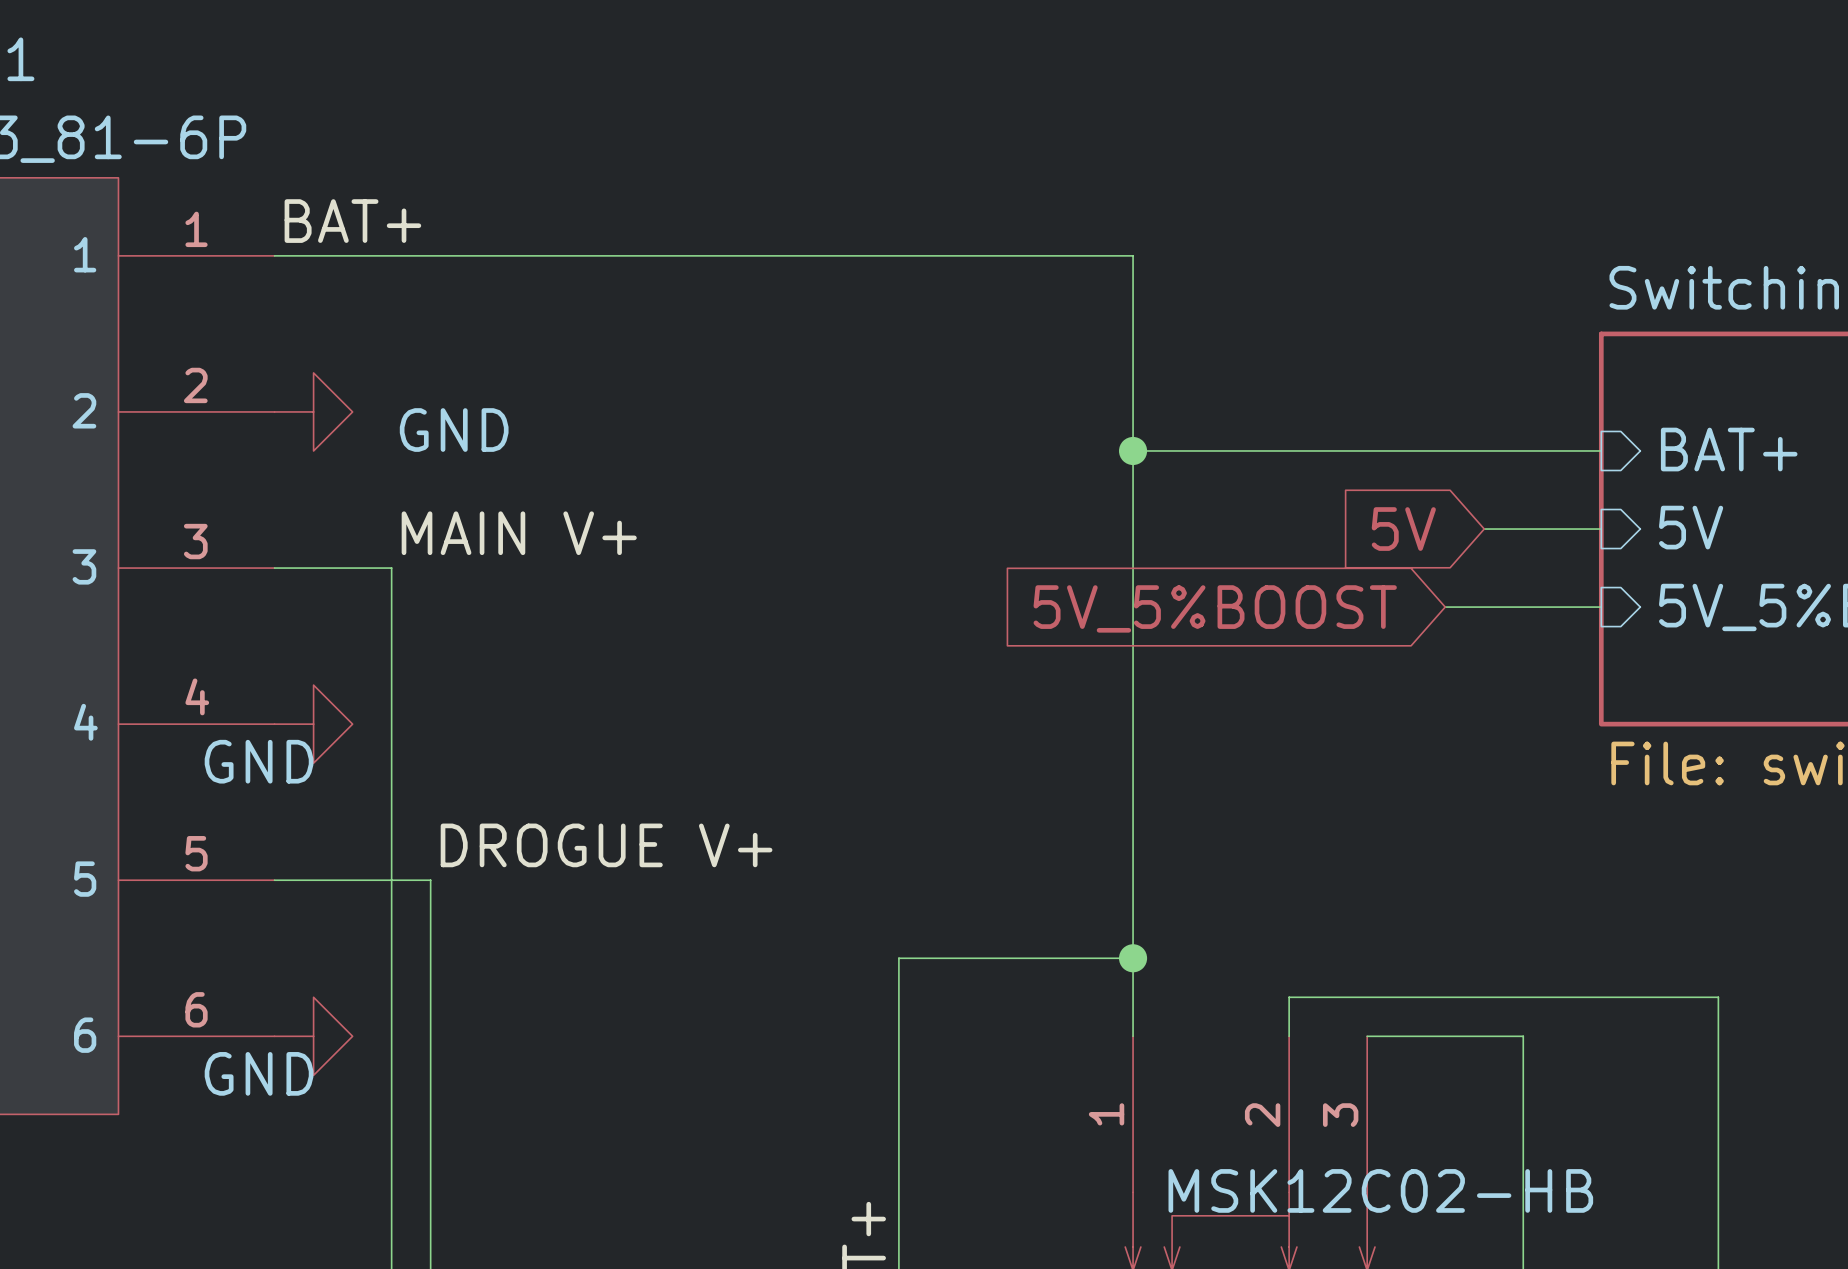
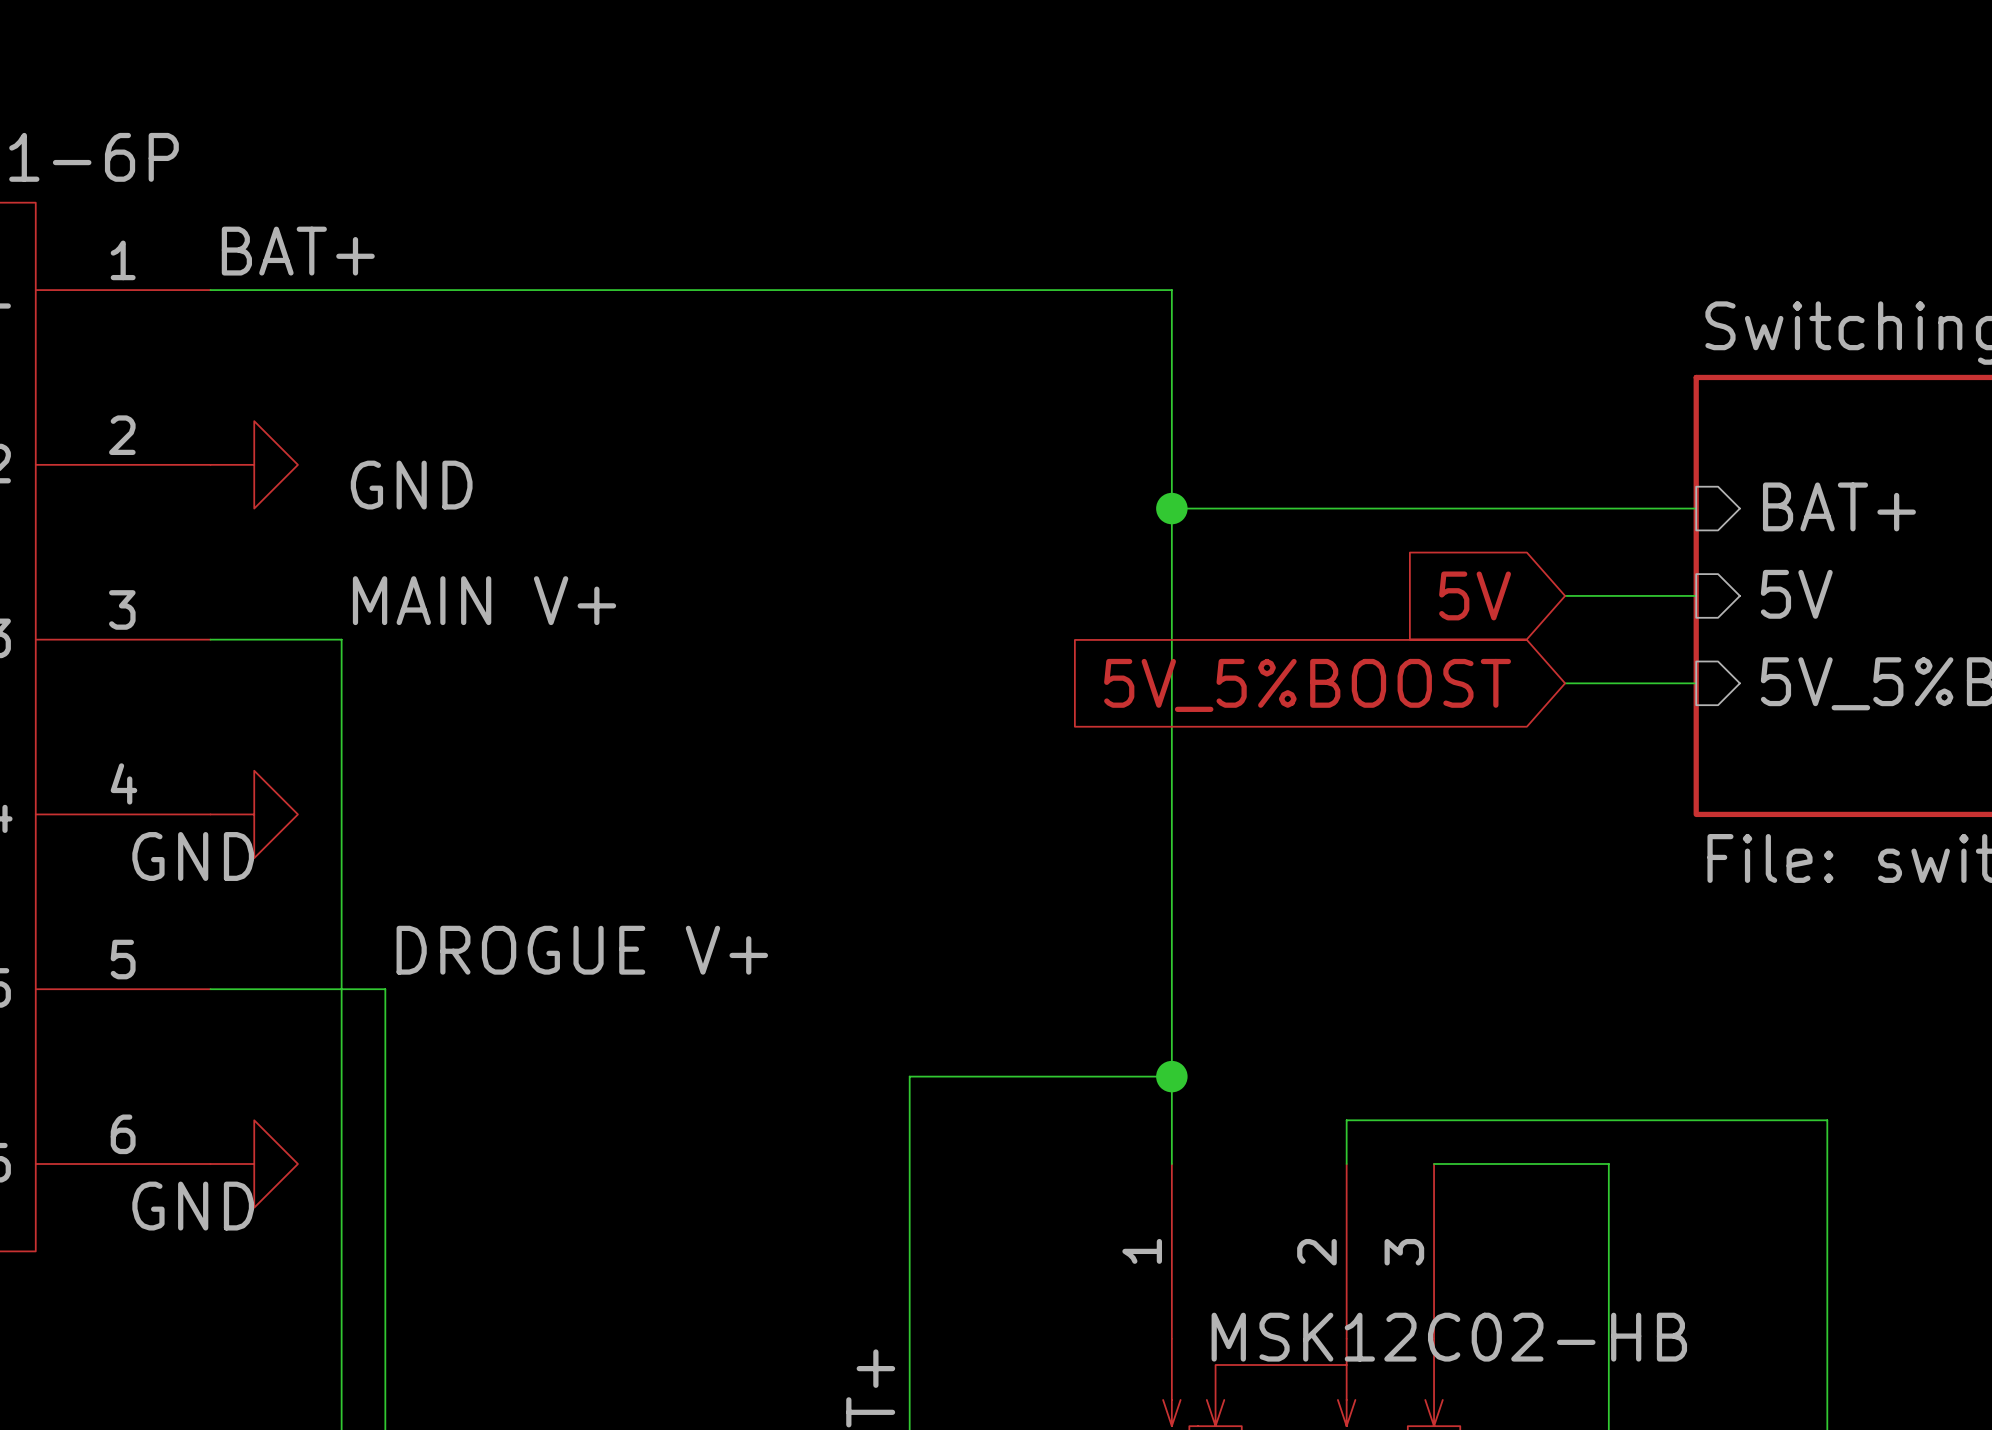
wire: (1445, 607) (1484, 607) -> none
global label position: 5V_5%BOOST (1215, 608) -> 5V_5%BOOST (1307, 685)

